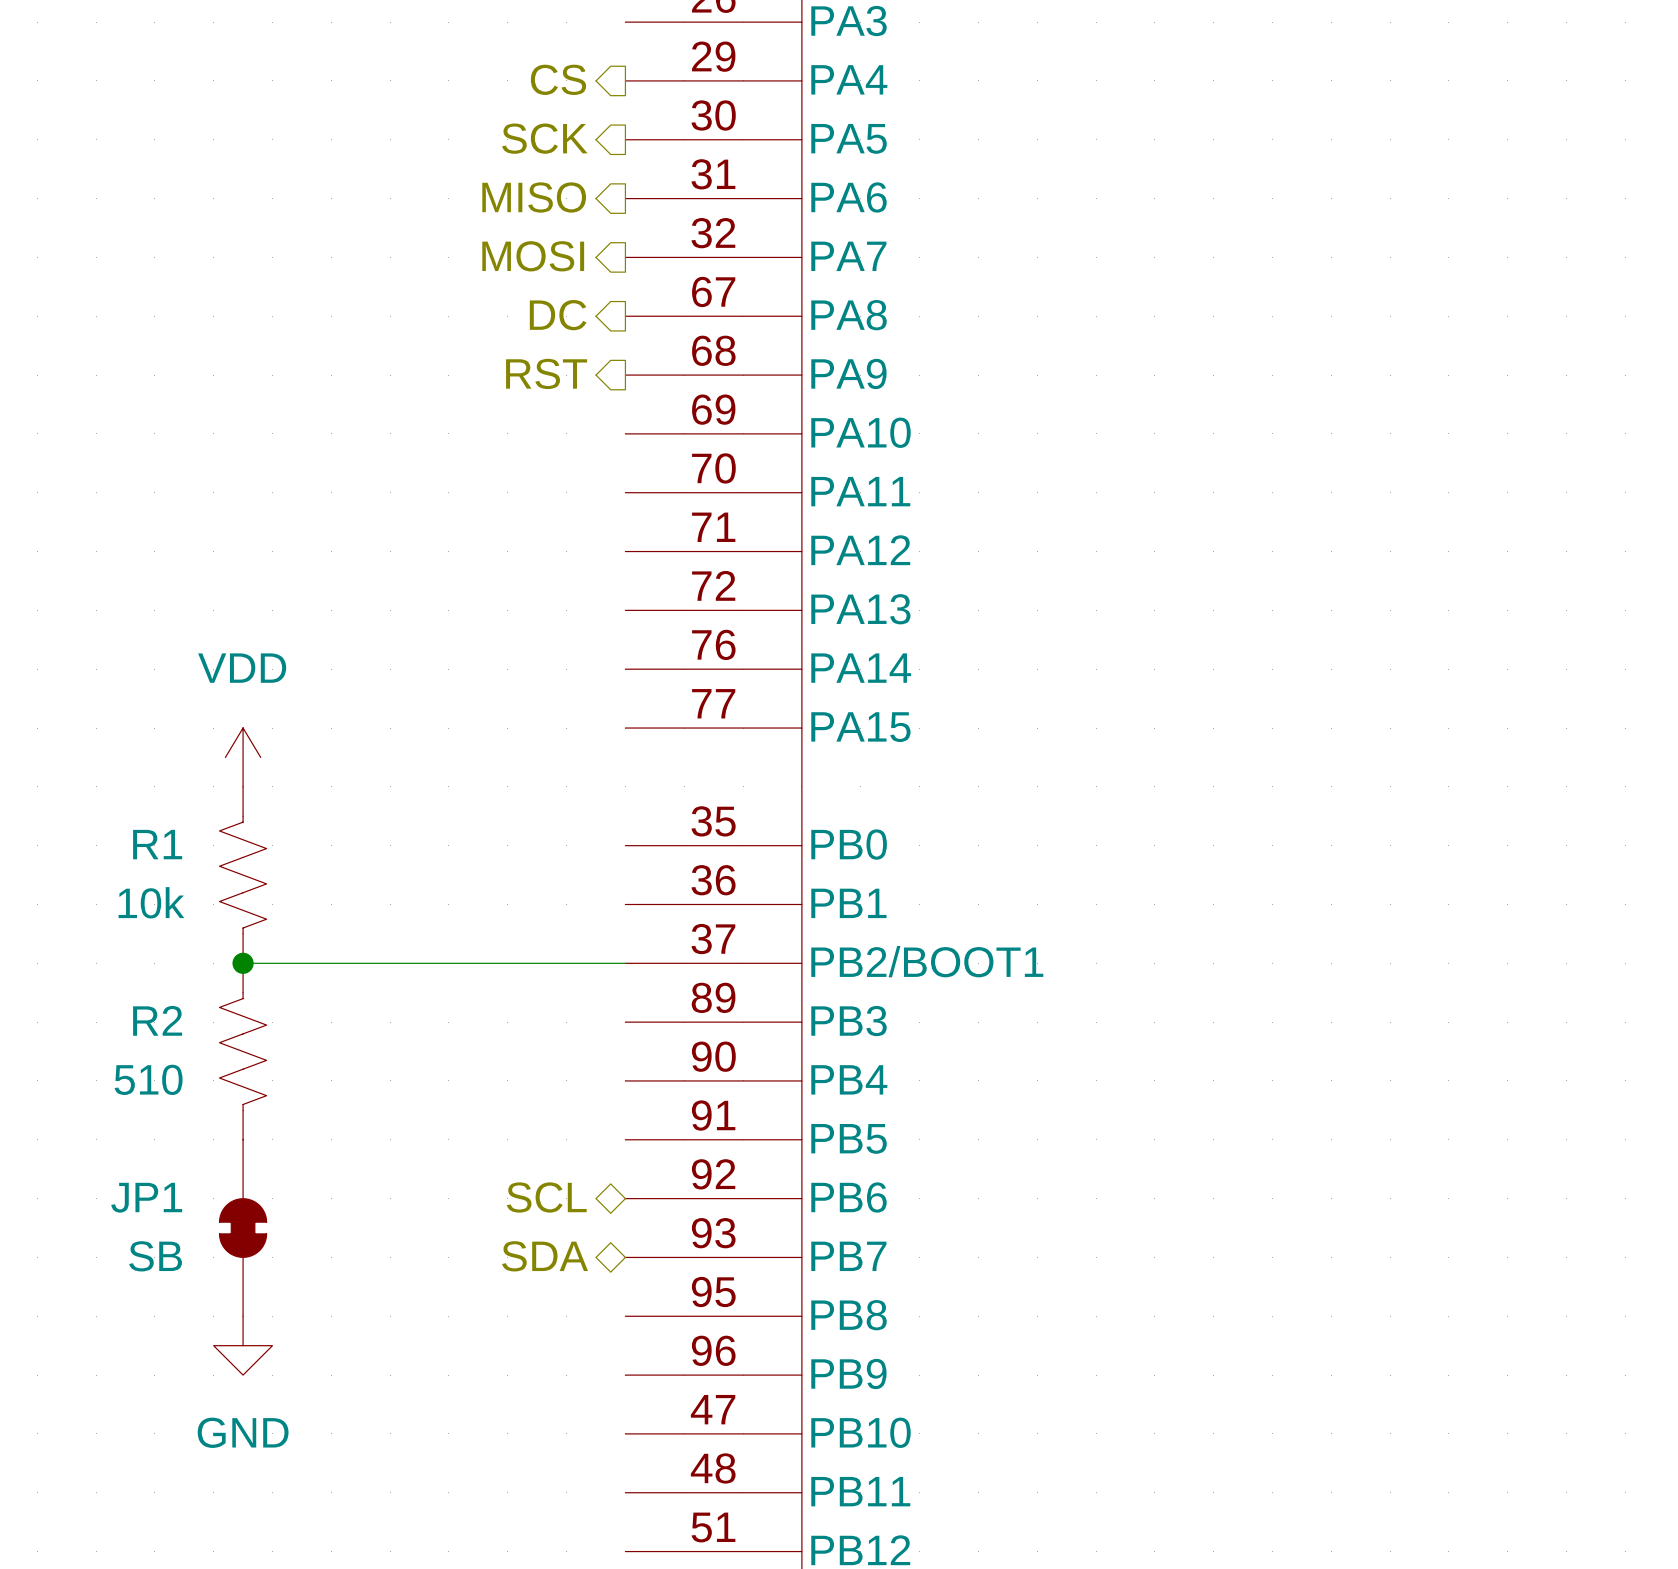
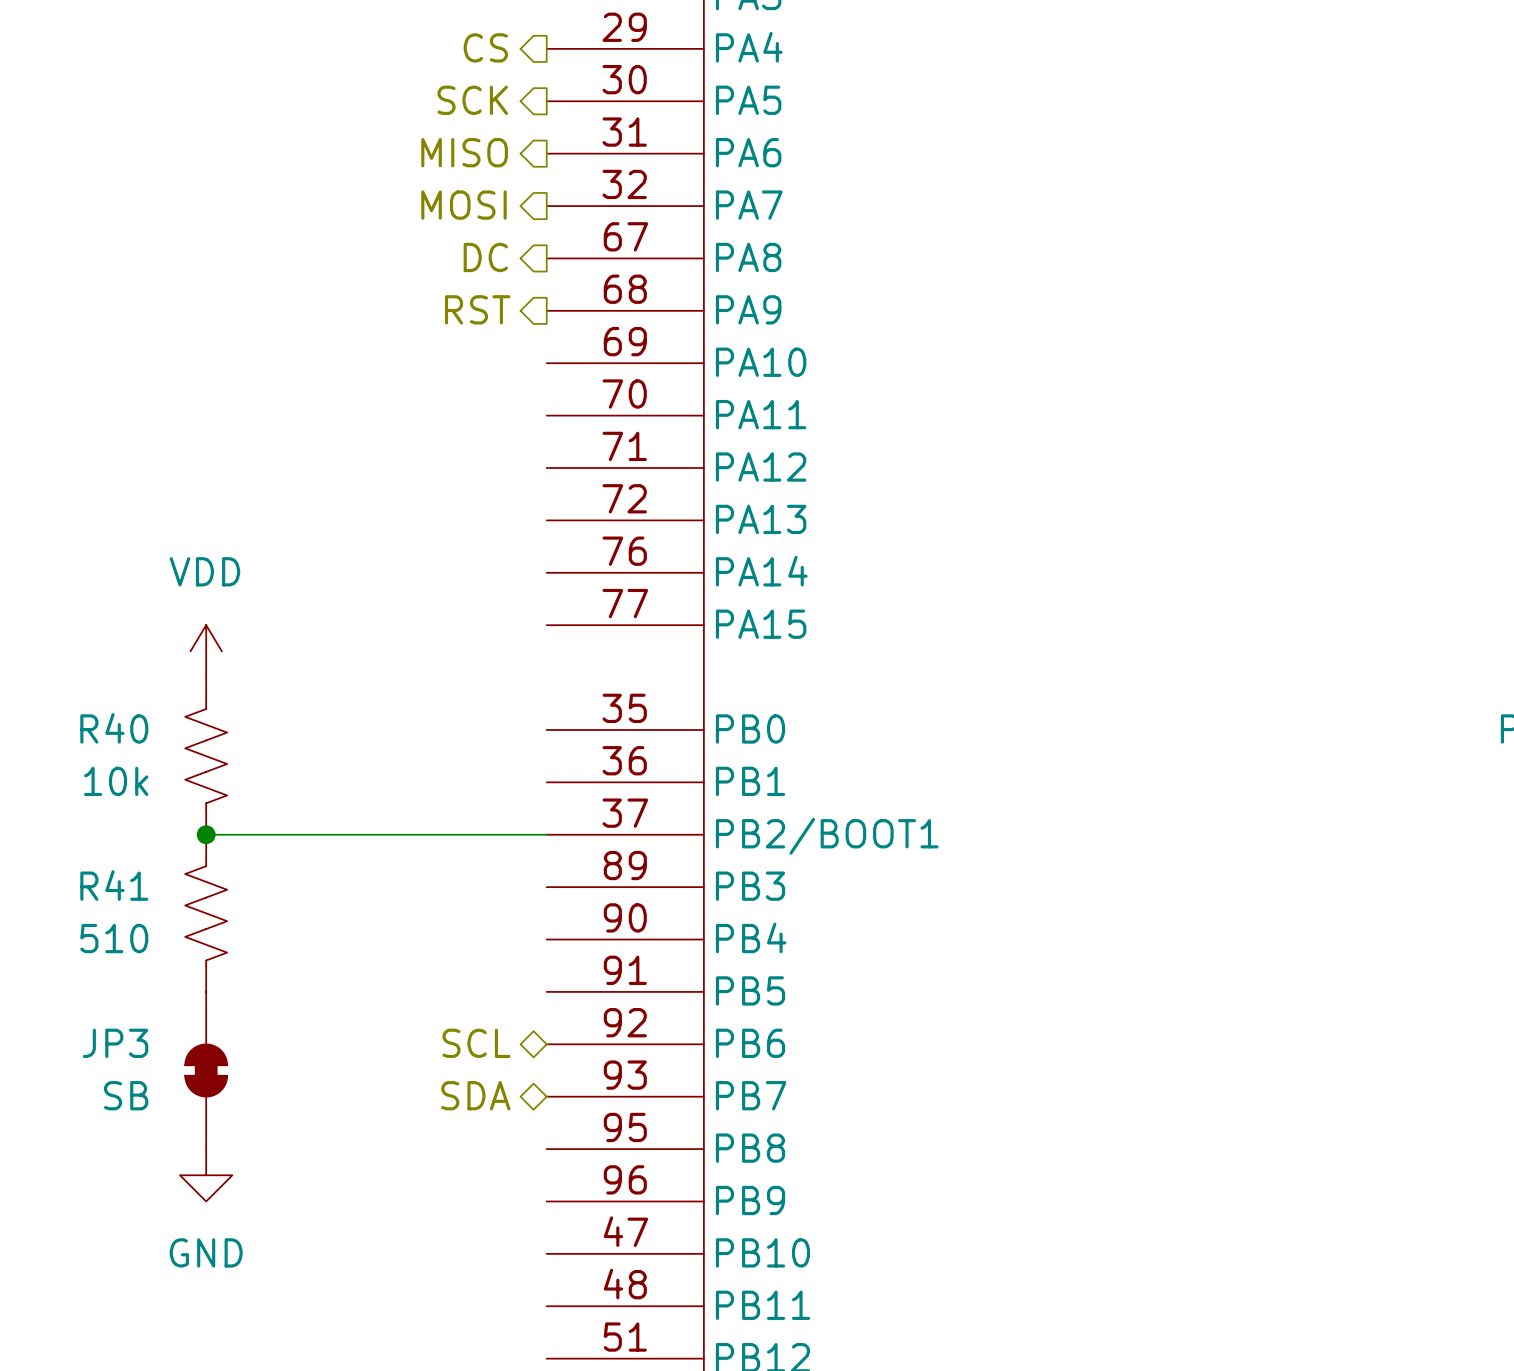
R1 name: R1 (157, 844) -> R40 (114, 728)
R2 name: R2 (157, 1020) -> R41 (114, 885)
JP1 name: JP1 (146, 1197) -> JP3 (115, 1043)

